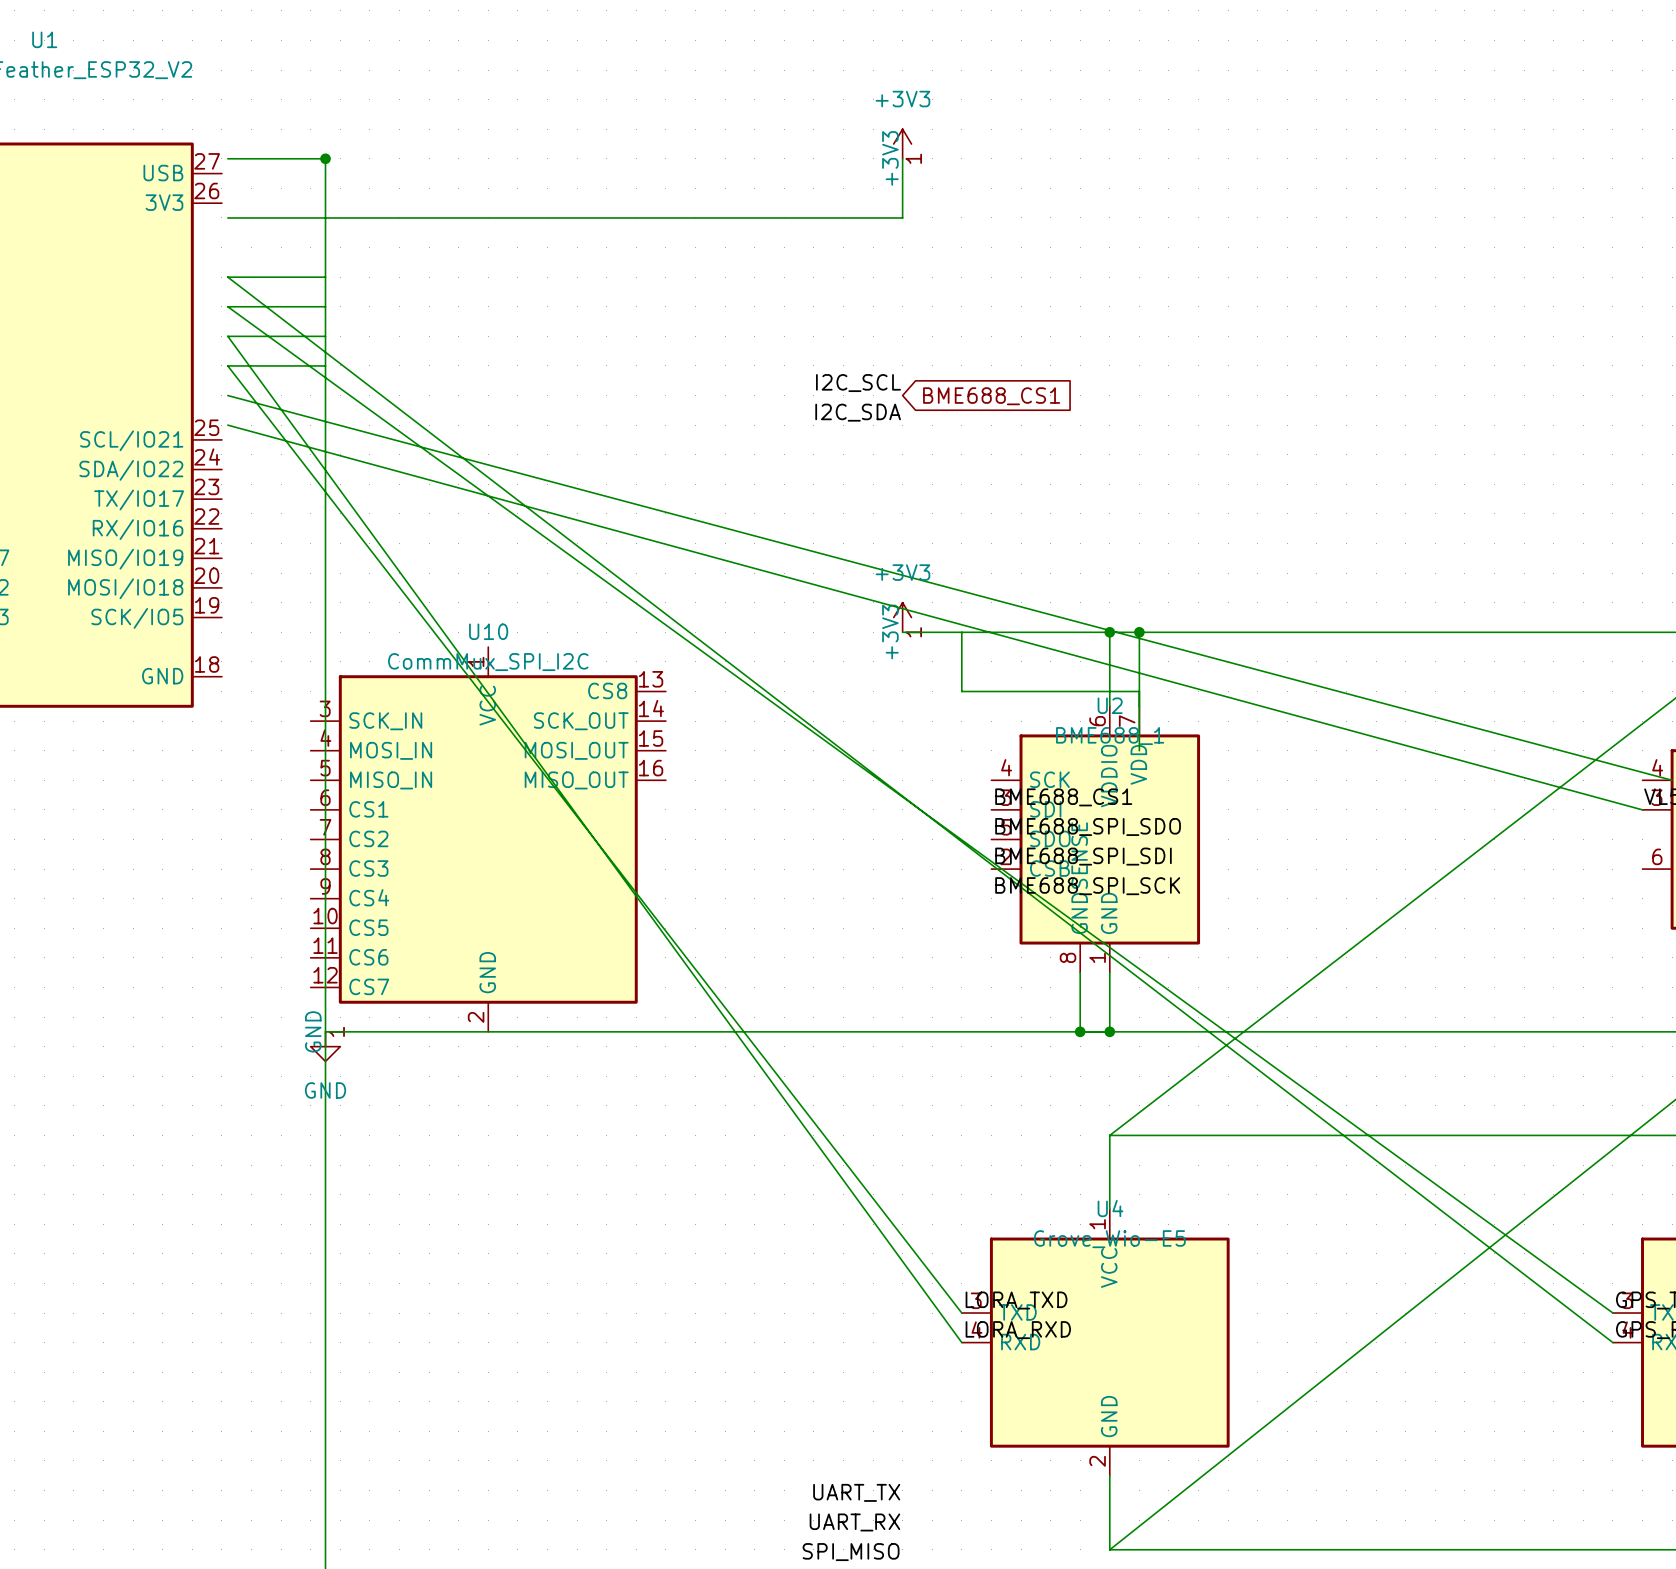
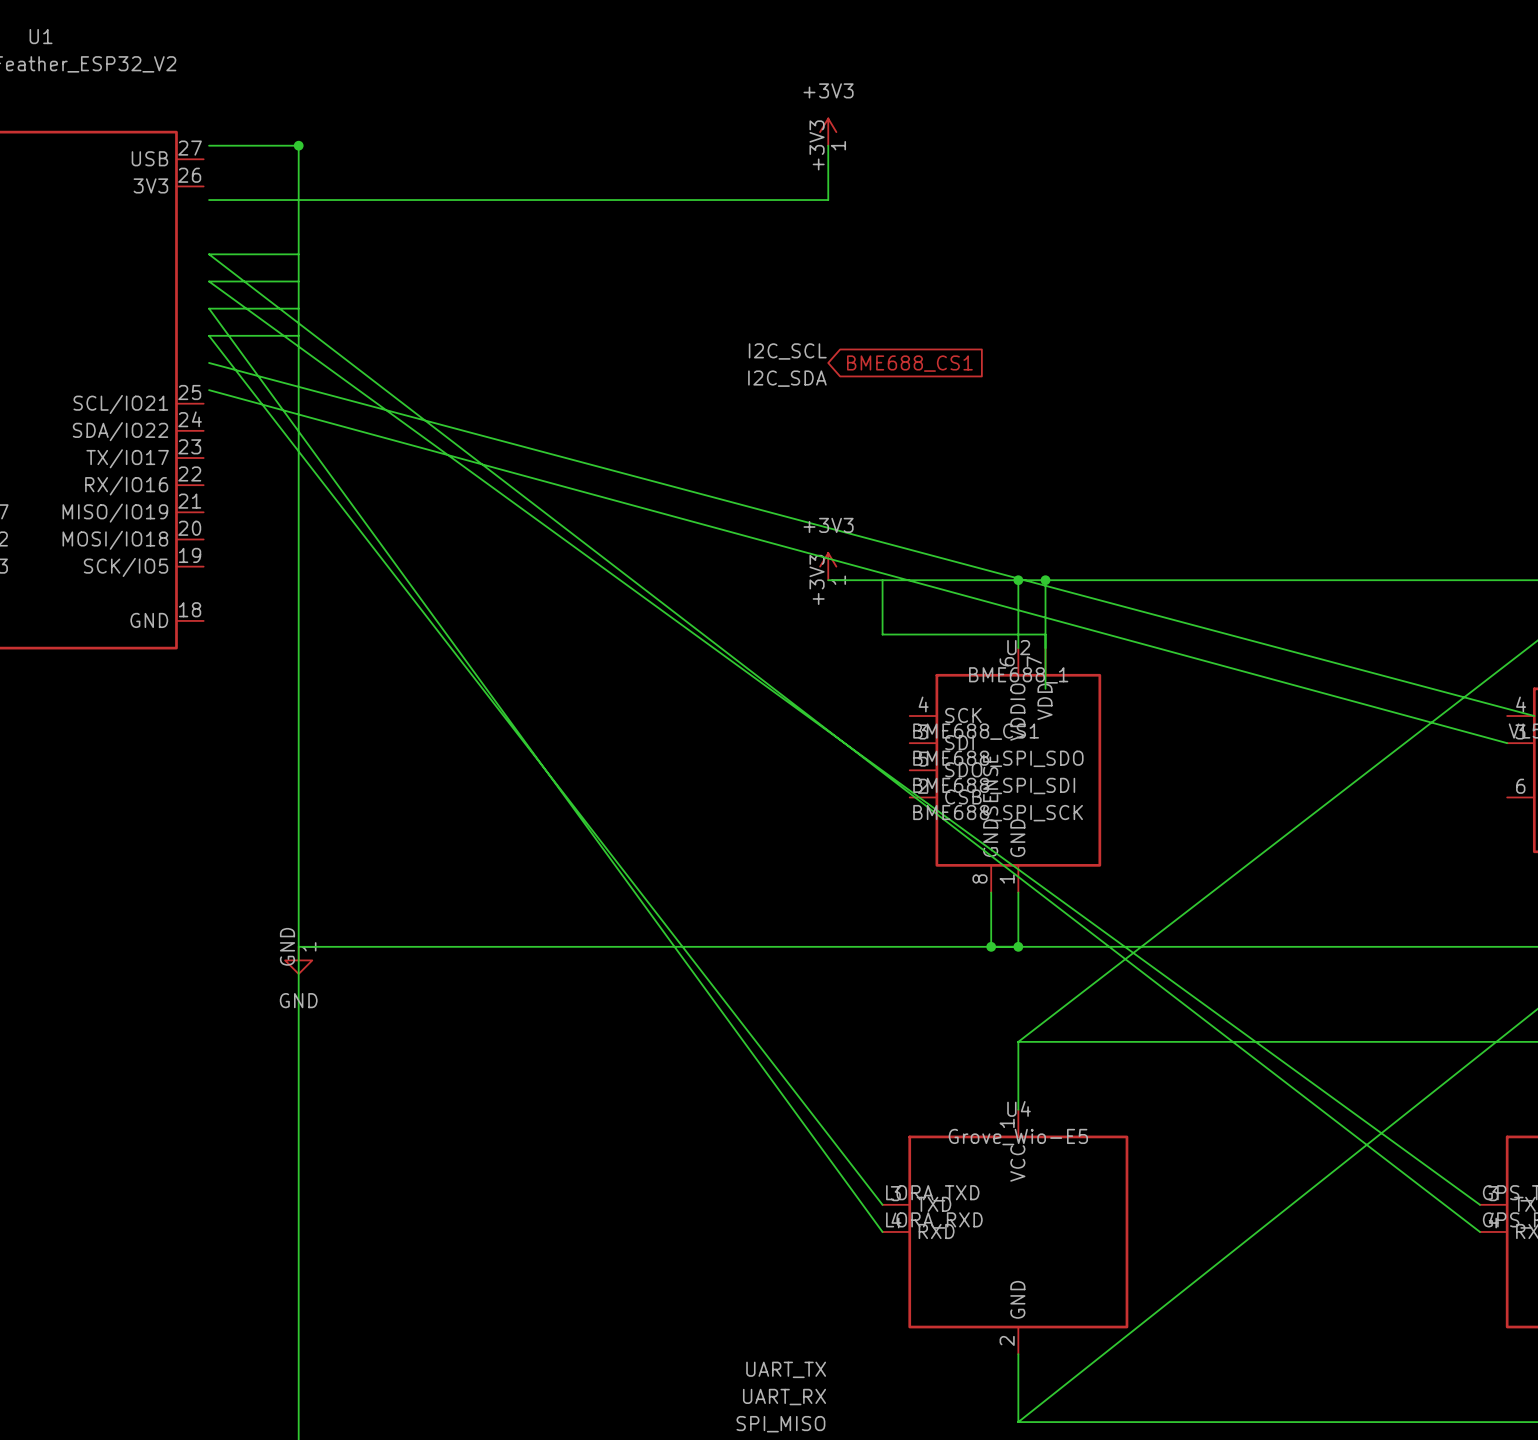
U10: CommMux_SPI_I2C (488, 839) -> none

